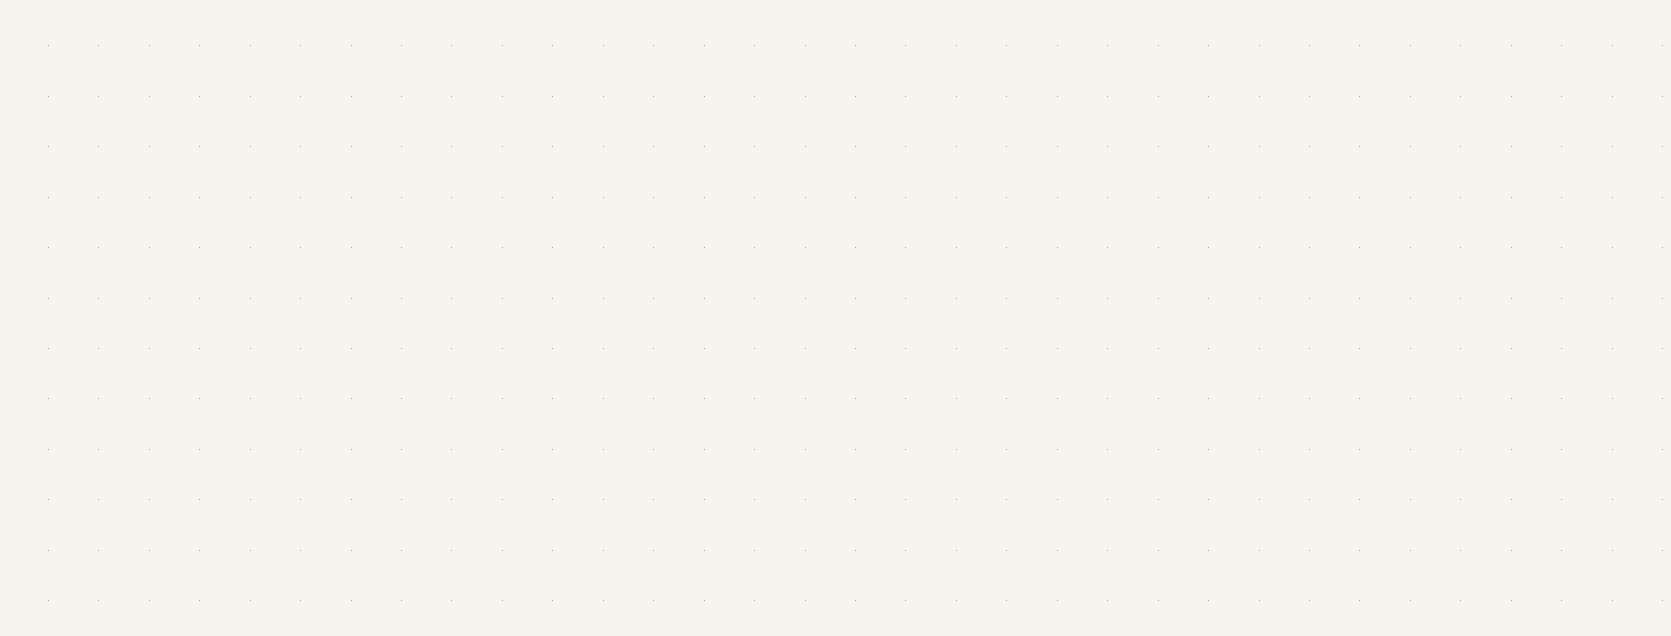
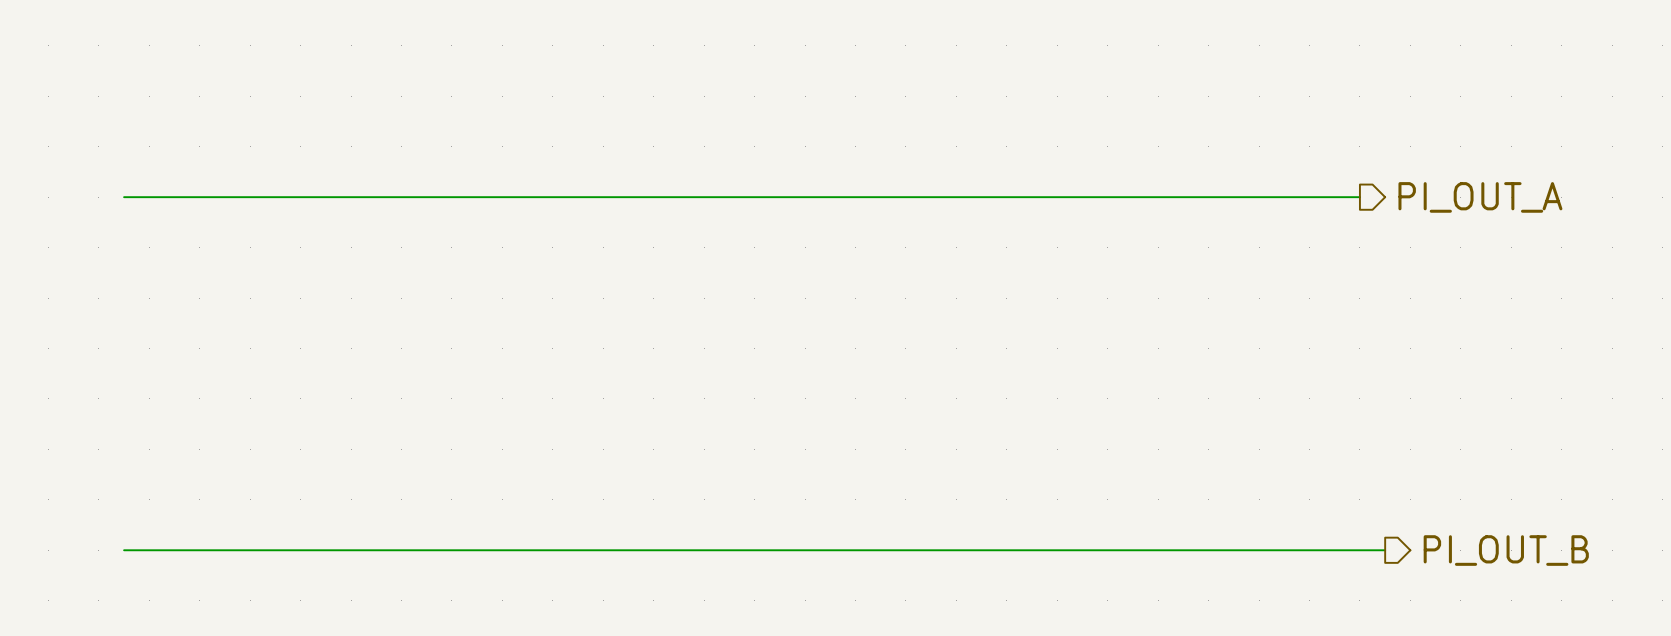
wire: none -> (124, 197) (1359, 197)
hierarchical label: none -> PI_OUT_A (1480, 197)
wire: none -> (124, 550) (1385, 550)
hierarchical label: none -> PI_OUT_B (1506, 550)

